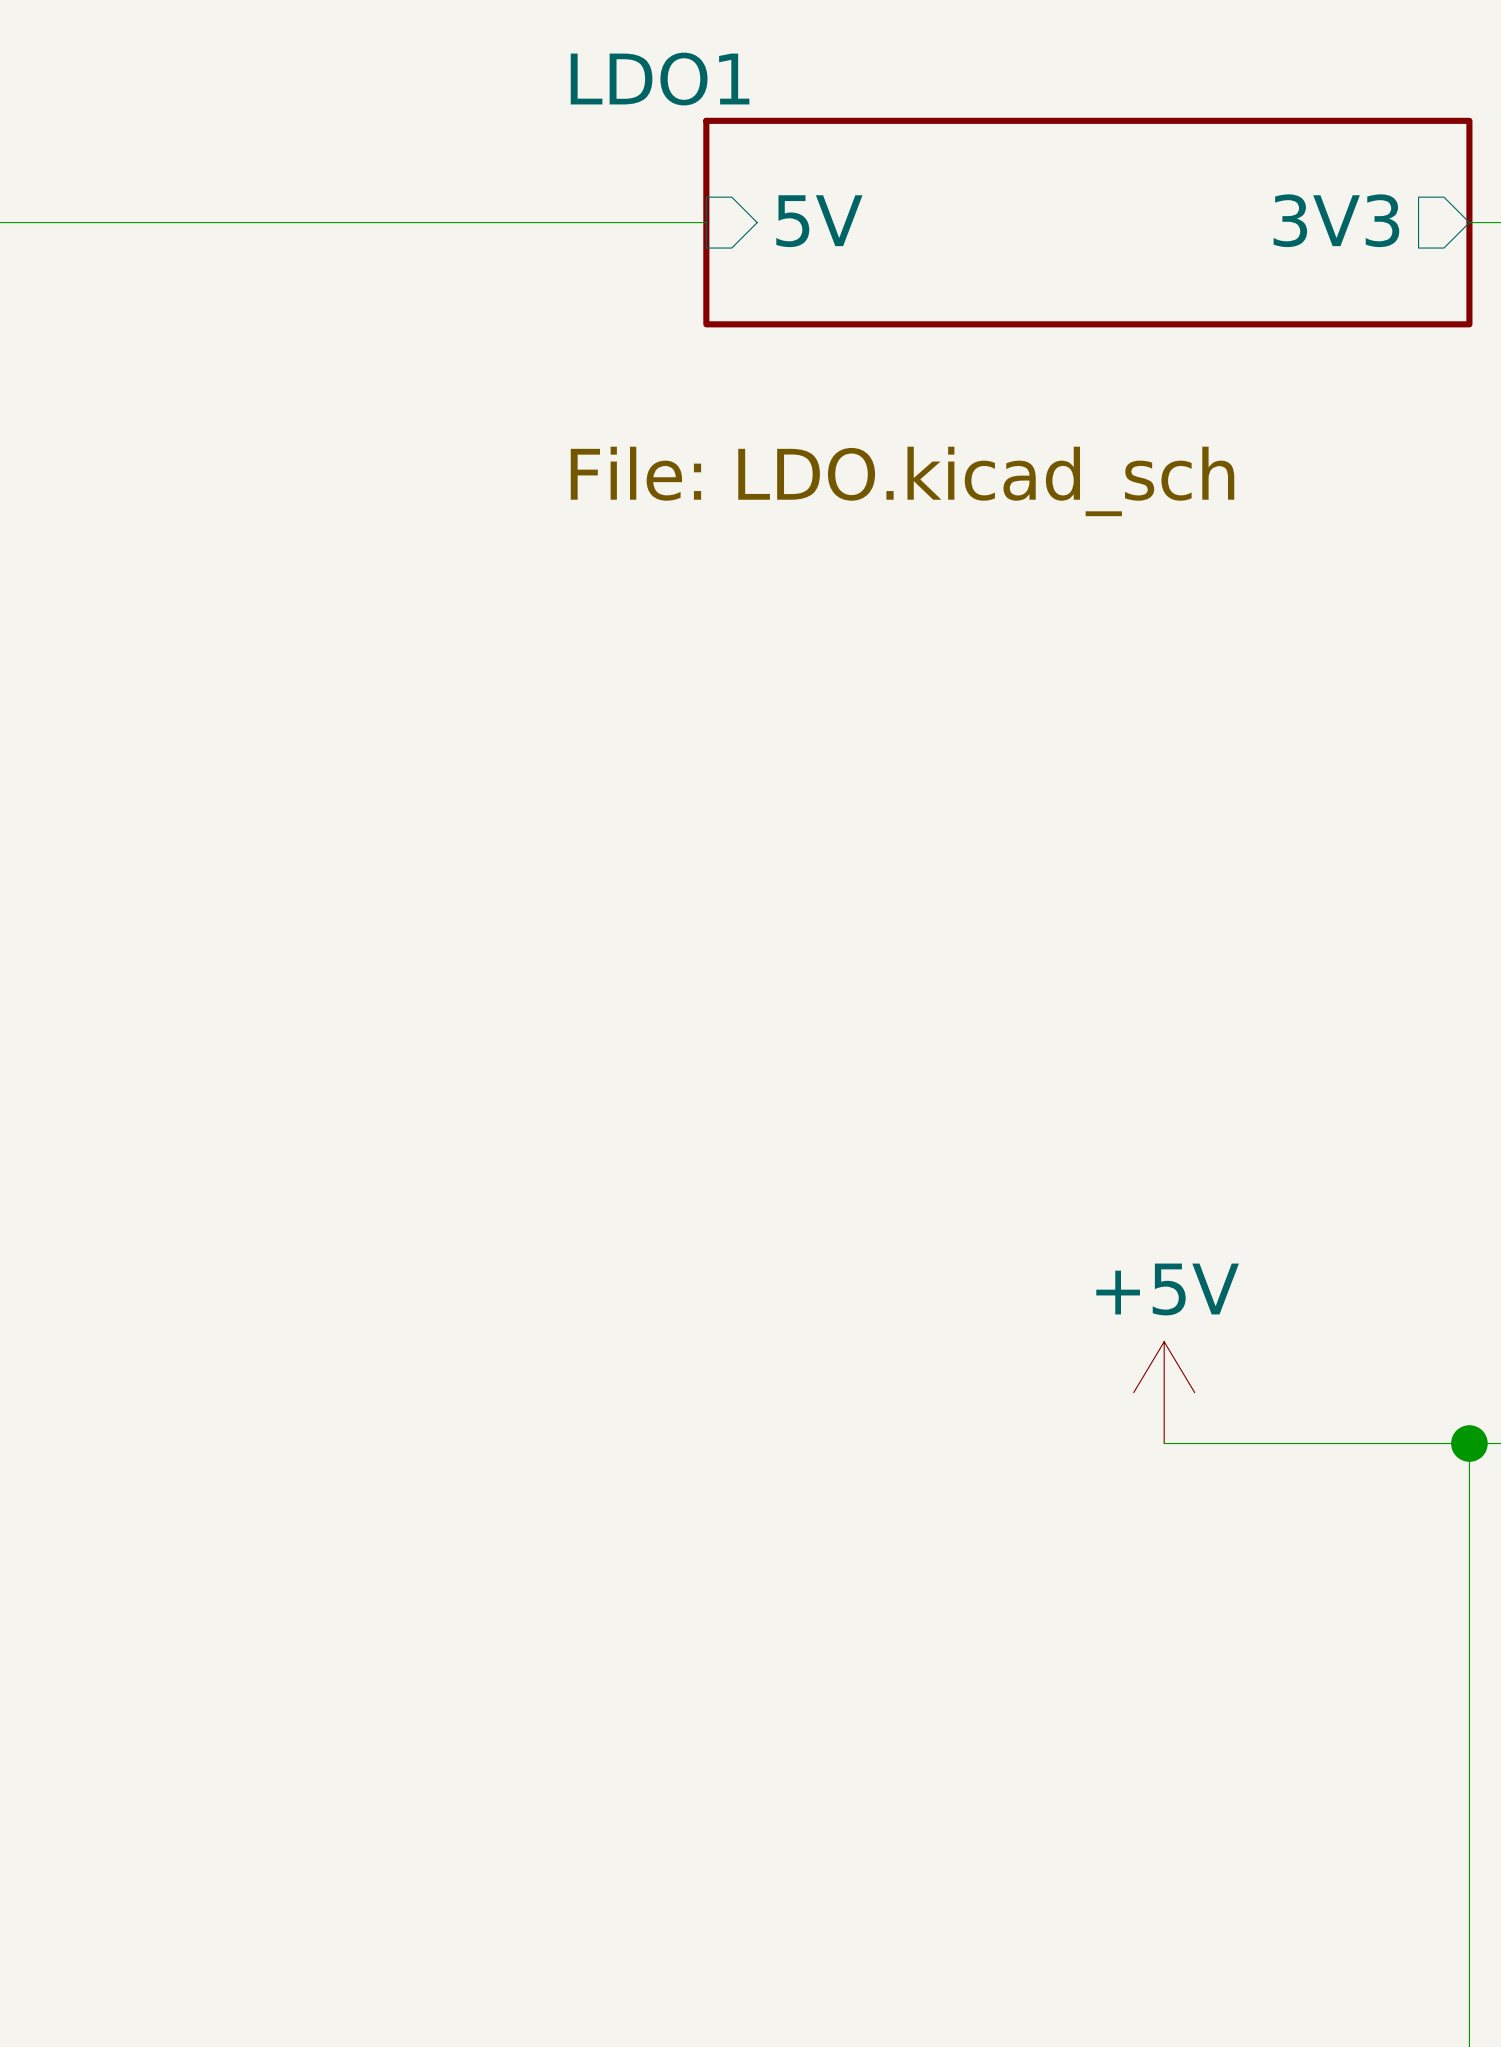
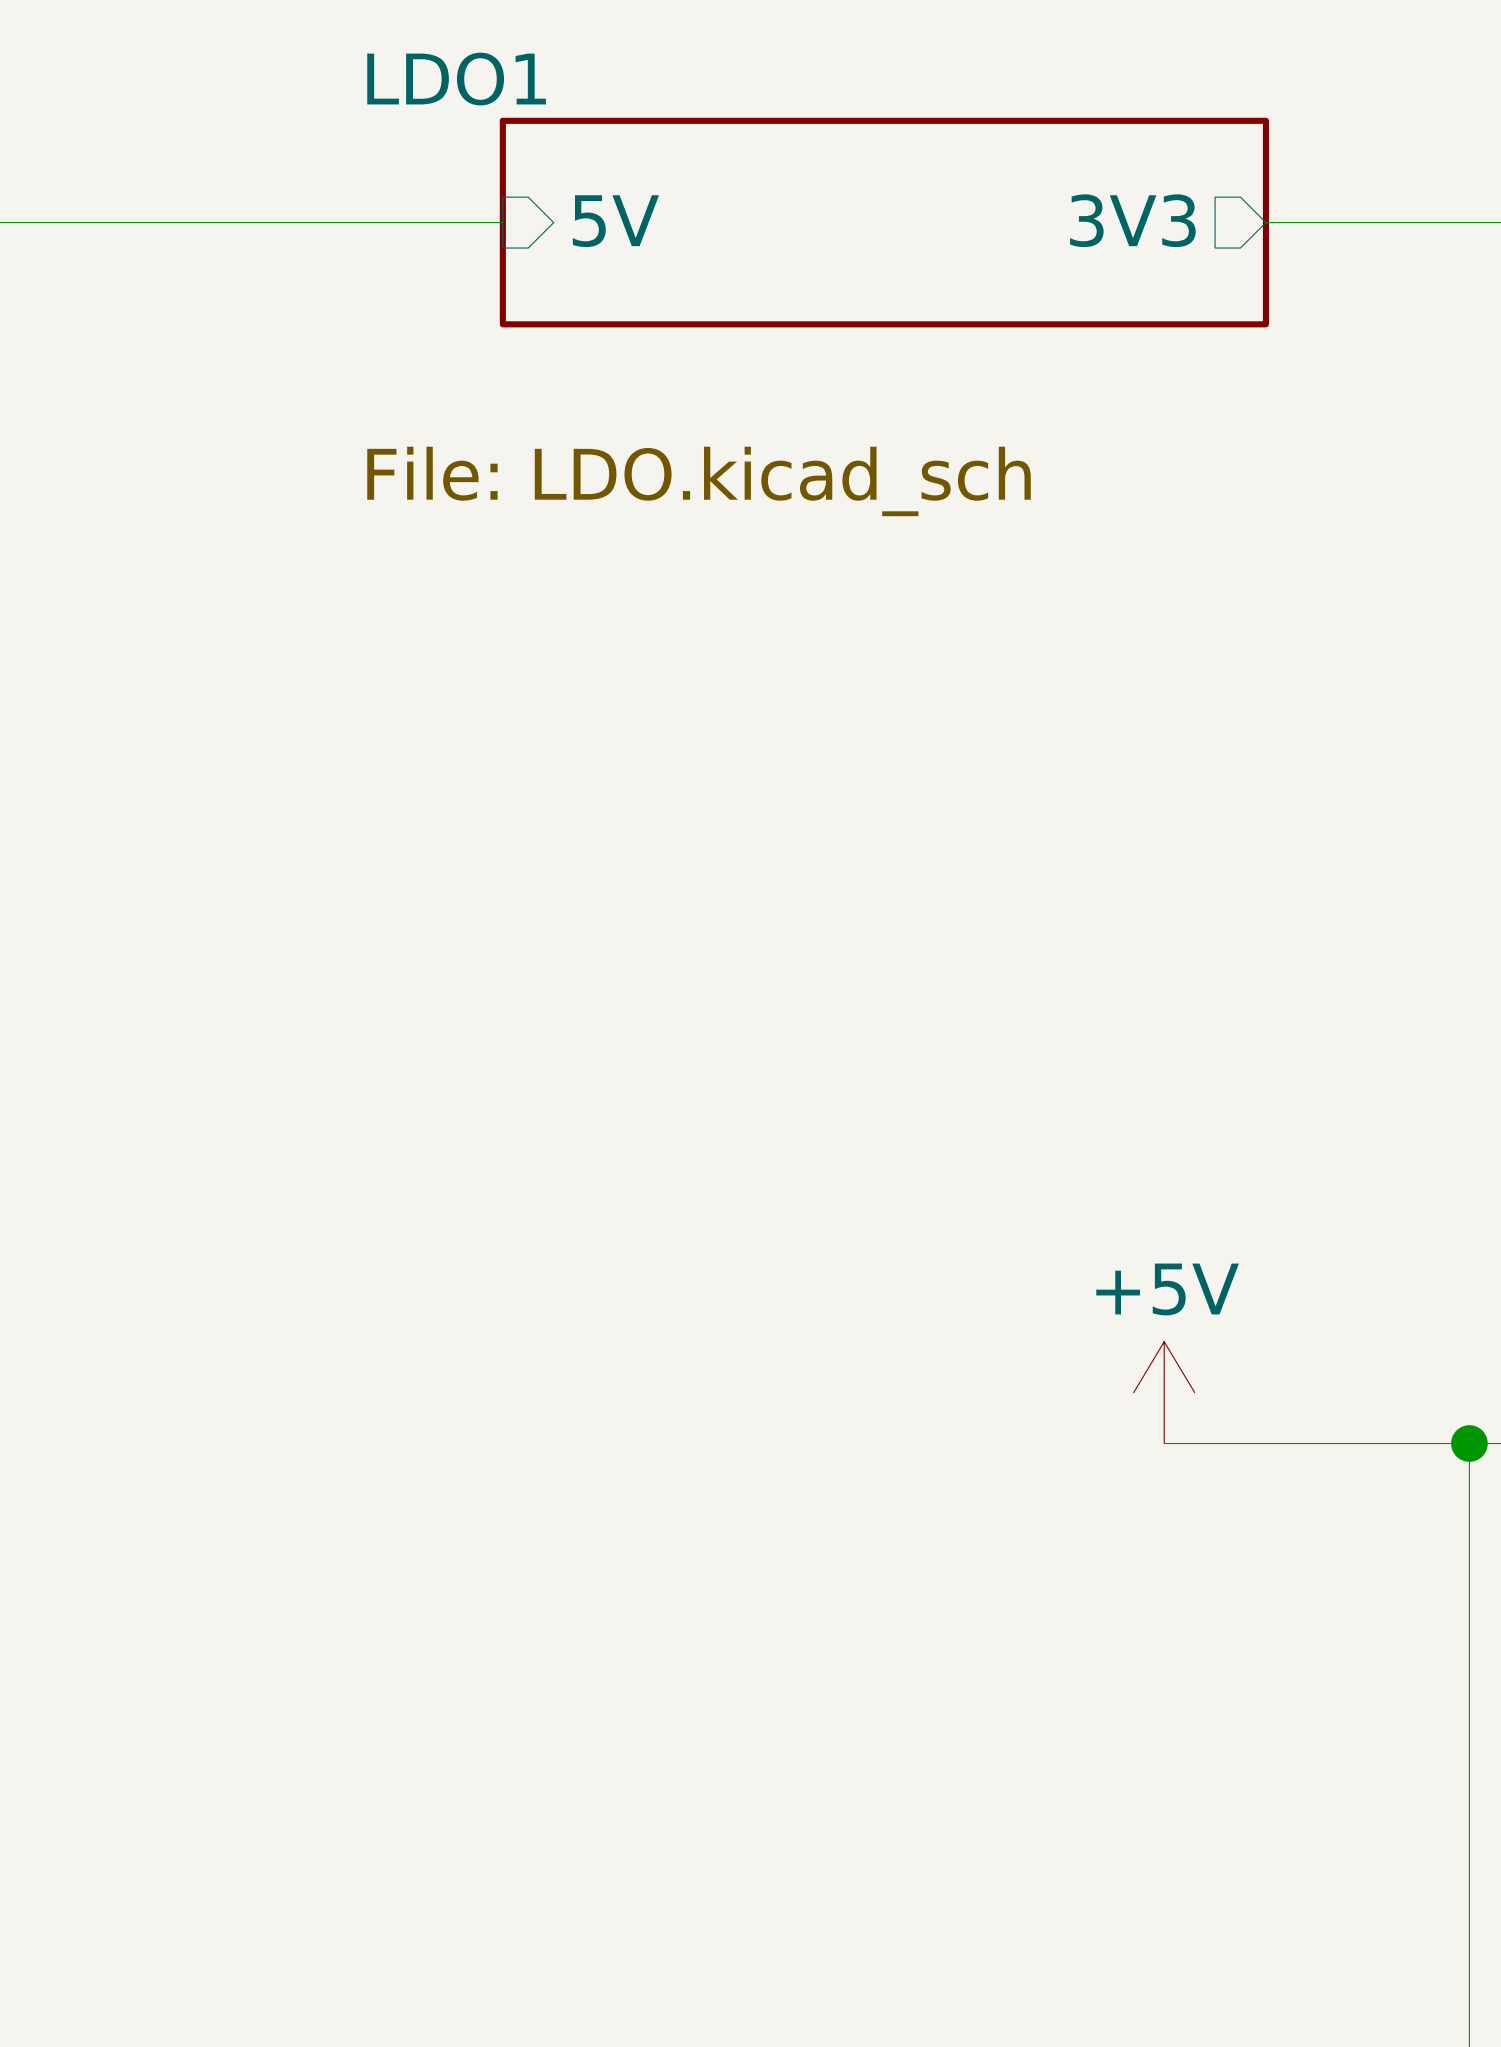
sheet pin position: 3V3 (1336, 220) -> 3V3 (1132, 220)
sheet pin position: 5V (819, 221) -> 5V (615, 221)
wire: (502, 222) (706, 222) -> (1265, 222) (1469, 222)
sheet LDO1 position: (1087, 222) -> (884, 222)

